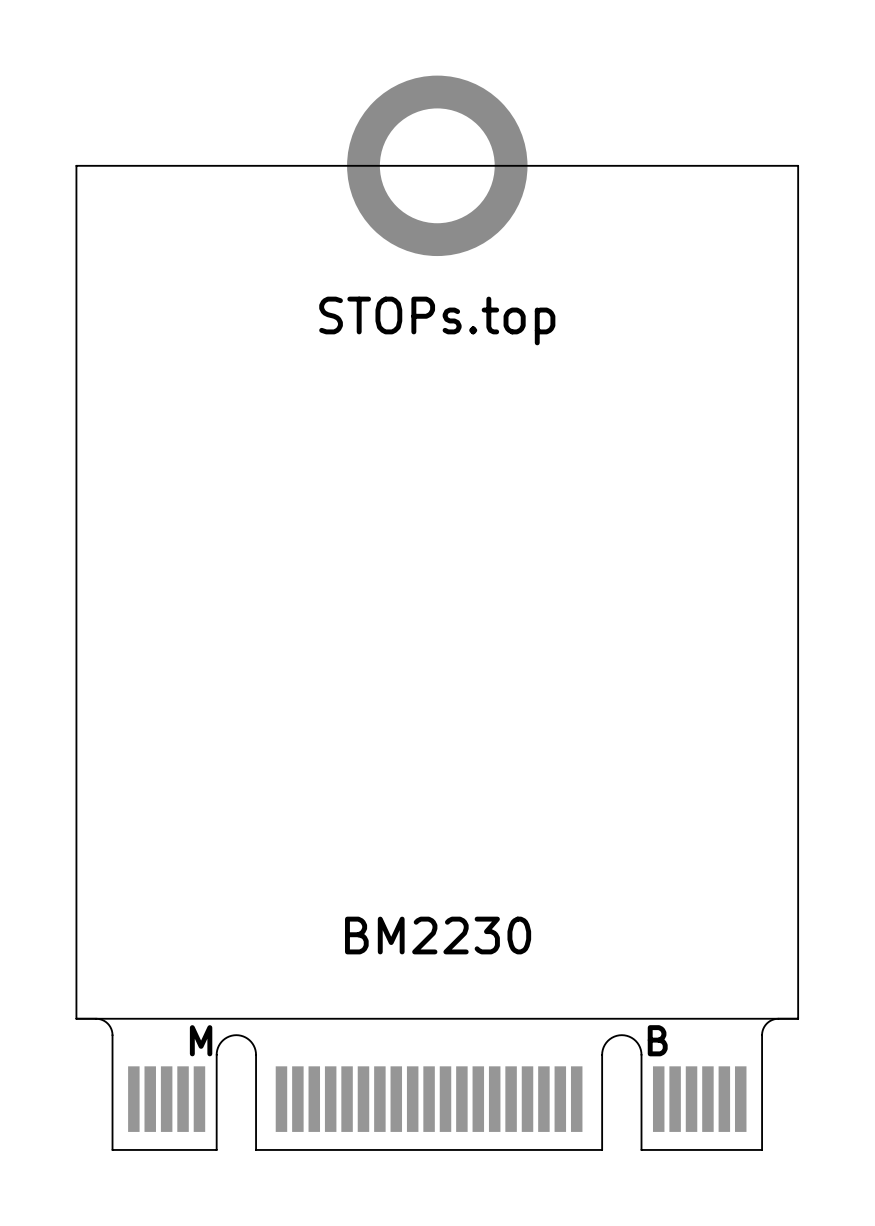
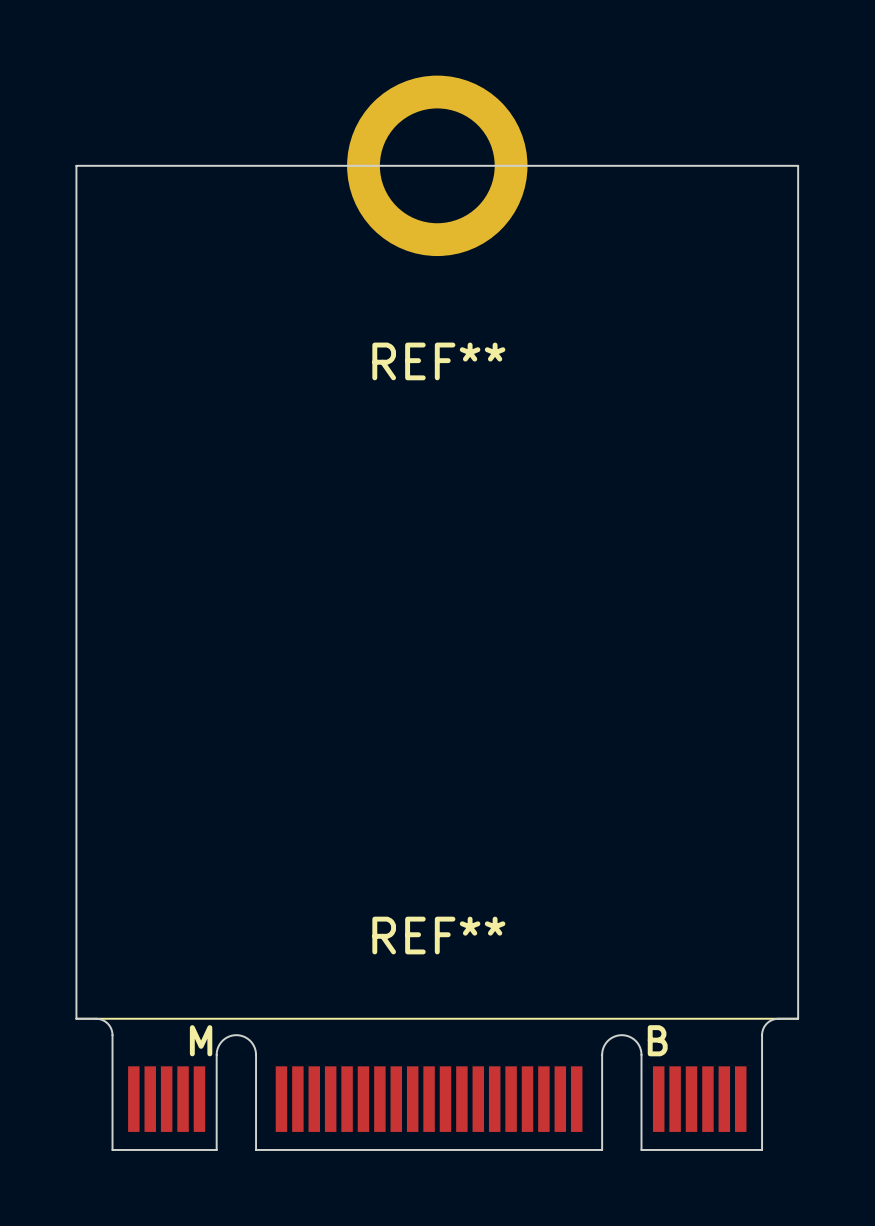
STOPs.top name: STOPs.top (437, 320) -> REF** (438, 361)
BM2230 name: BM2230 (438, 935) -> REF** (438, 935)

